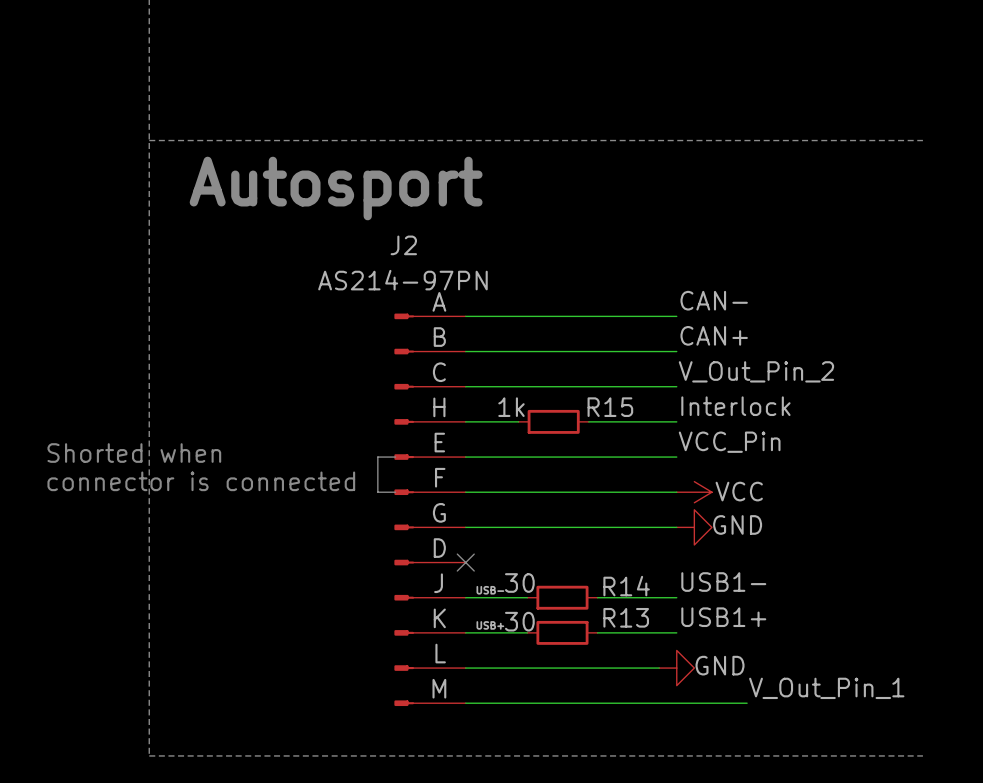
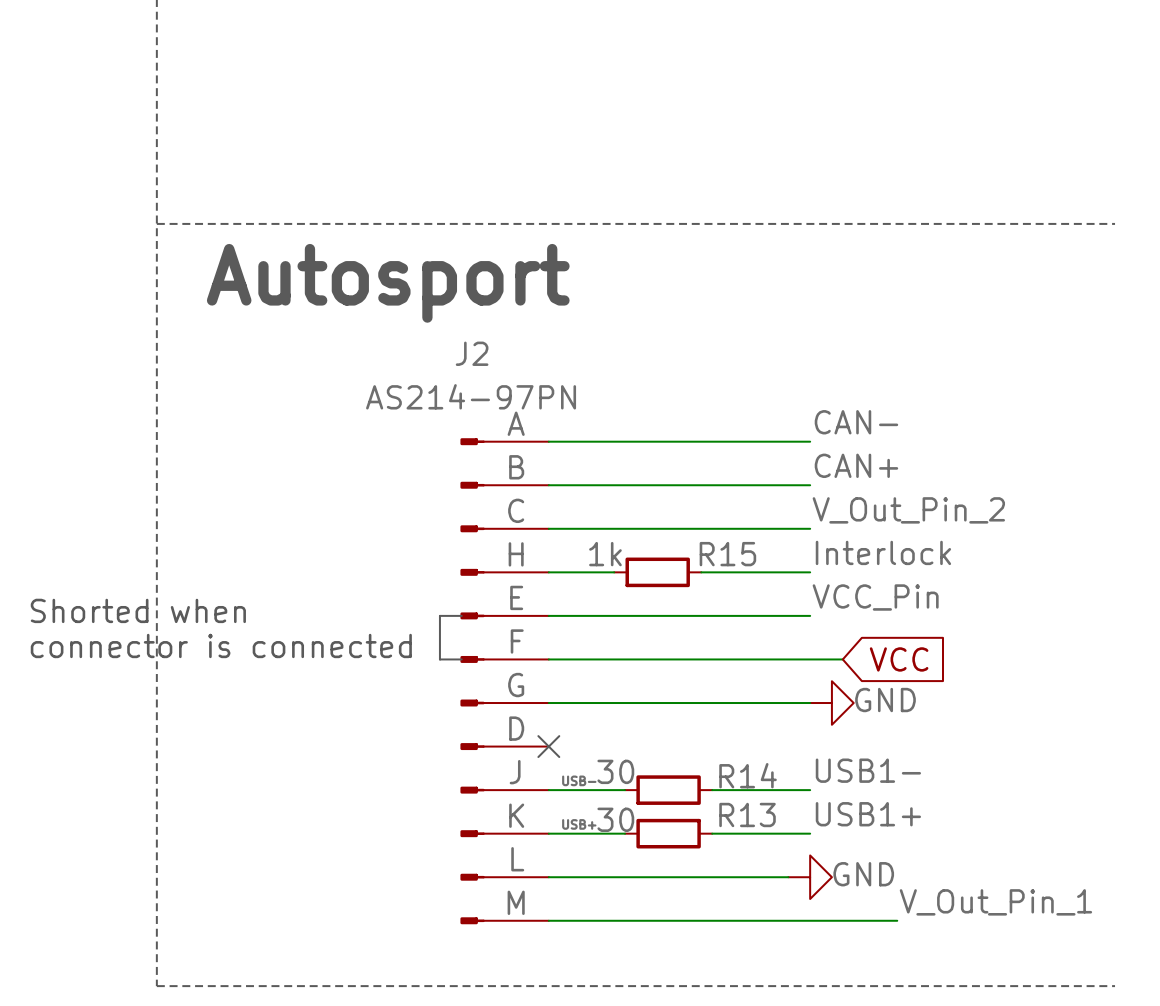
power symbol: VCC (694, 492) -> none
global label: none -> VCC (899, 659)

